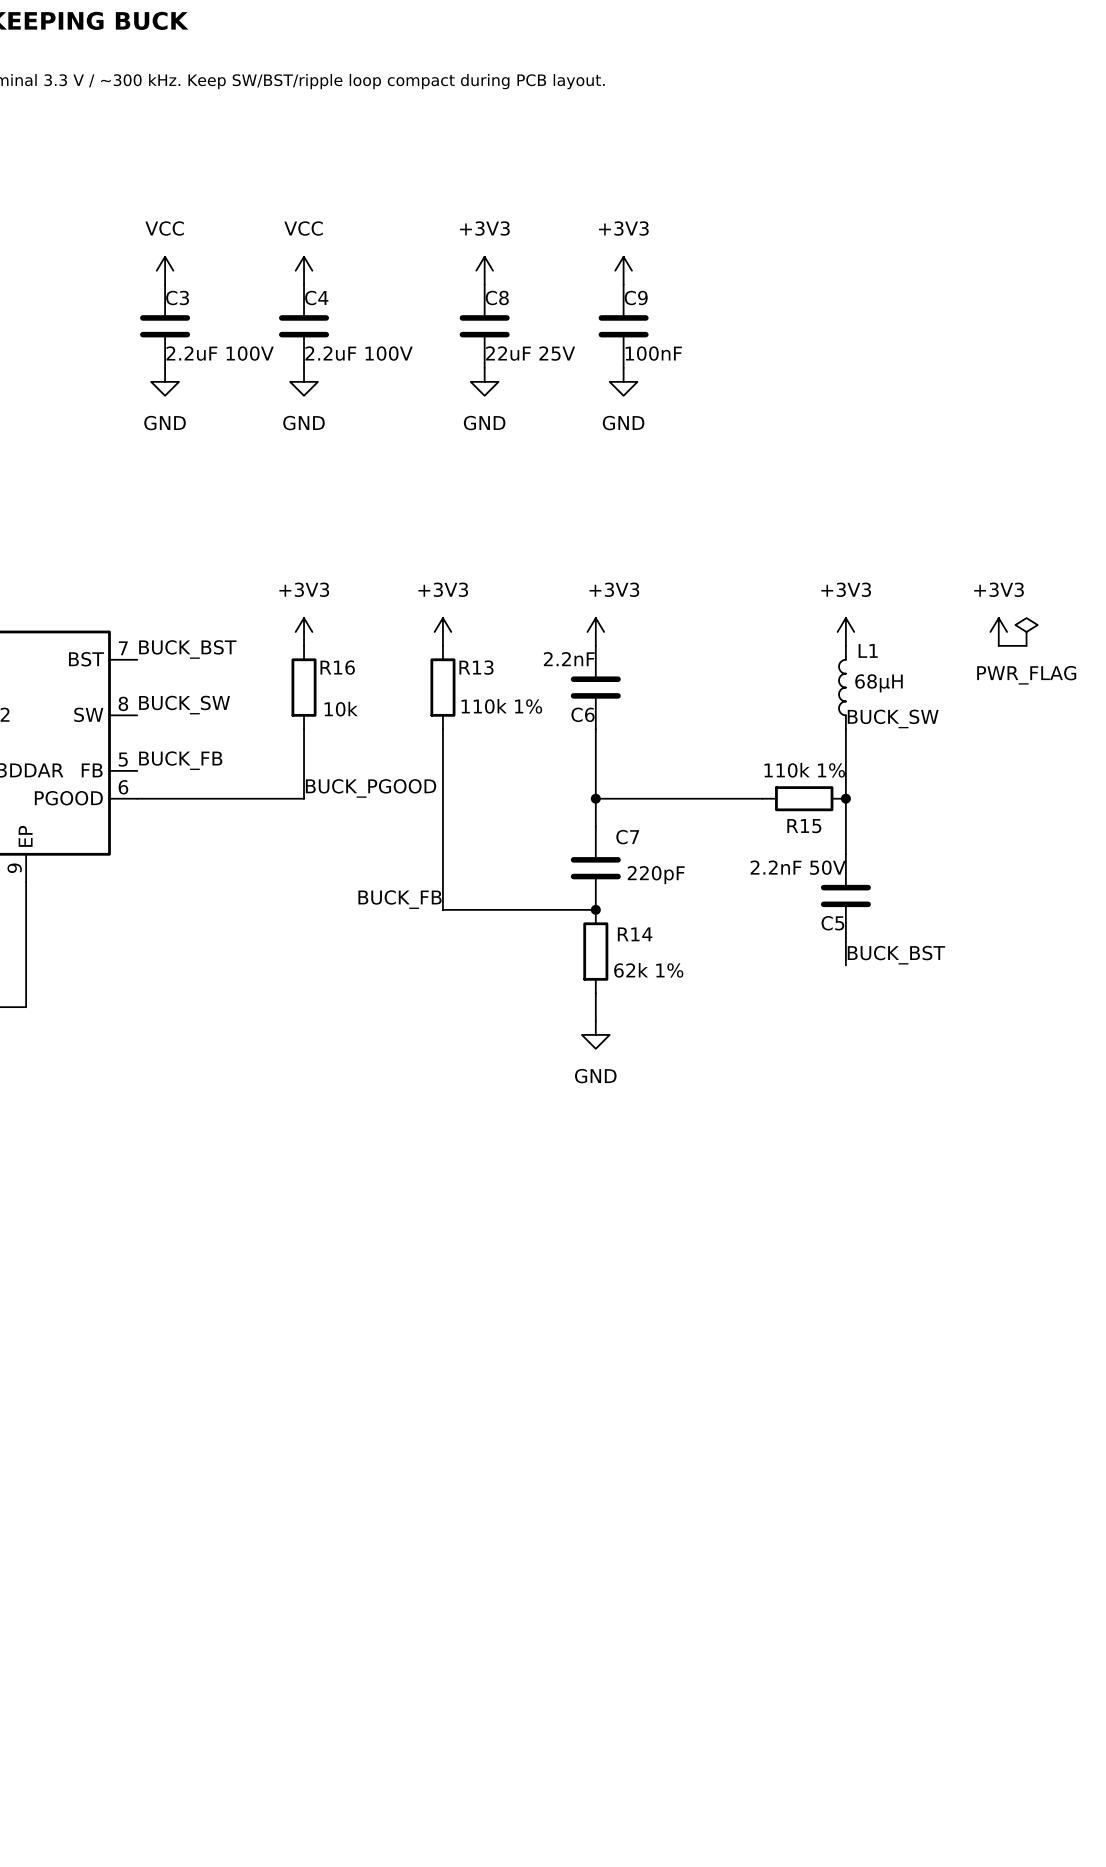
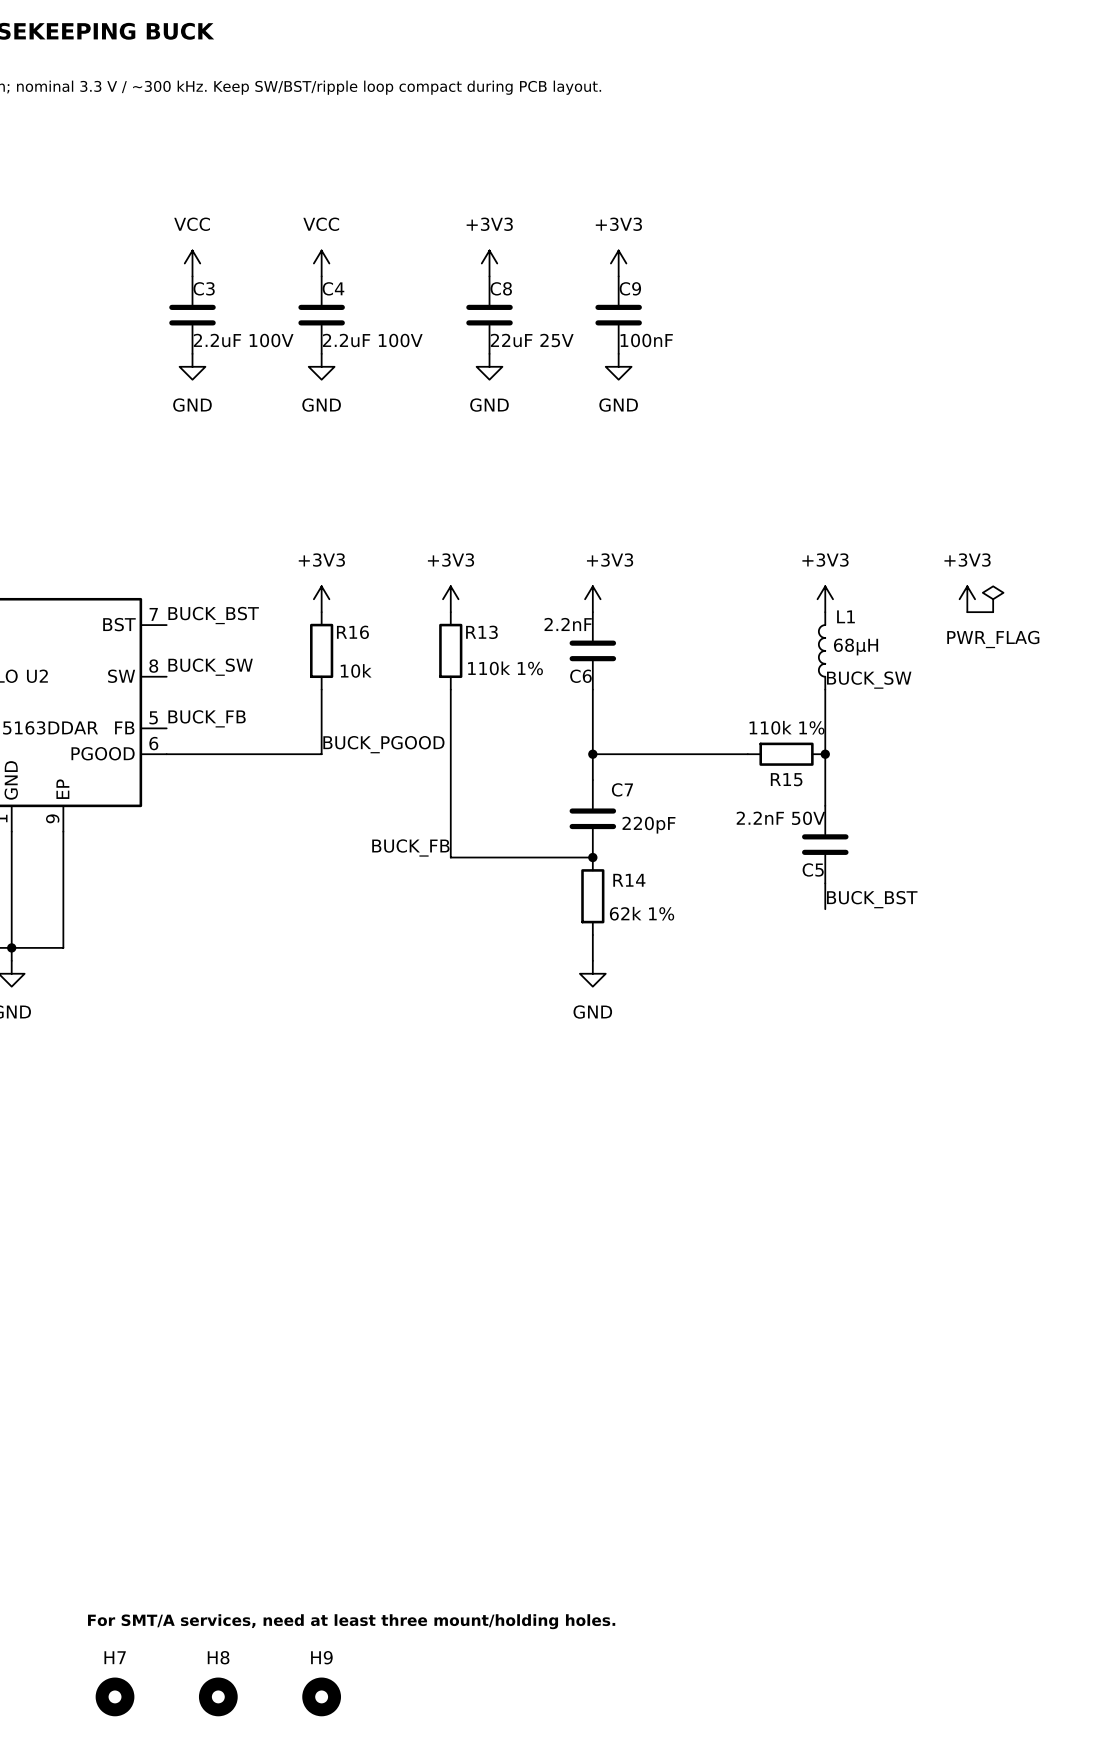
text: none -> For SMT/A services, need at least three mount/holding holes. (351, 1621)
H7: none -> (115, 1696)
H8: none -> (218, 1696)
H9: none -> (321, 1696)

